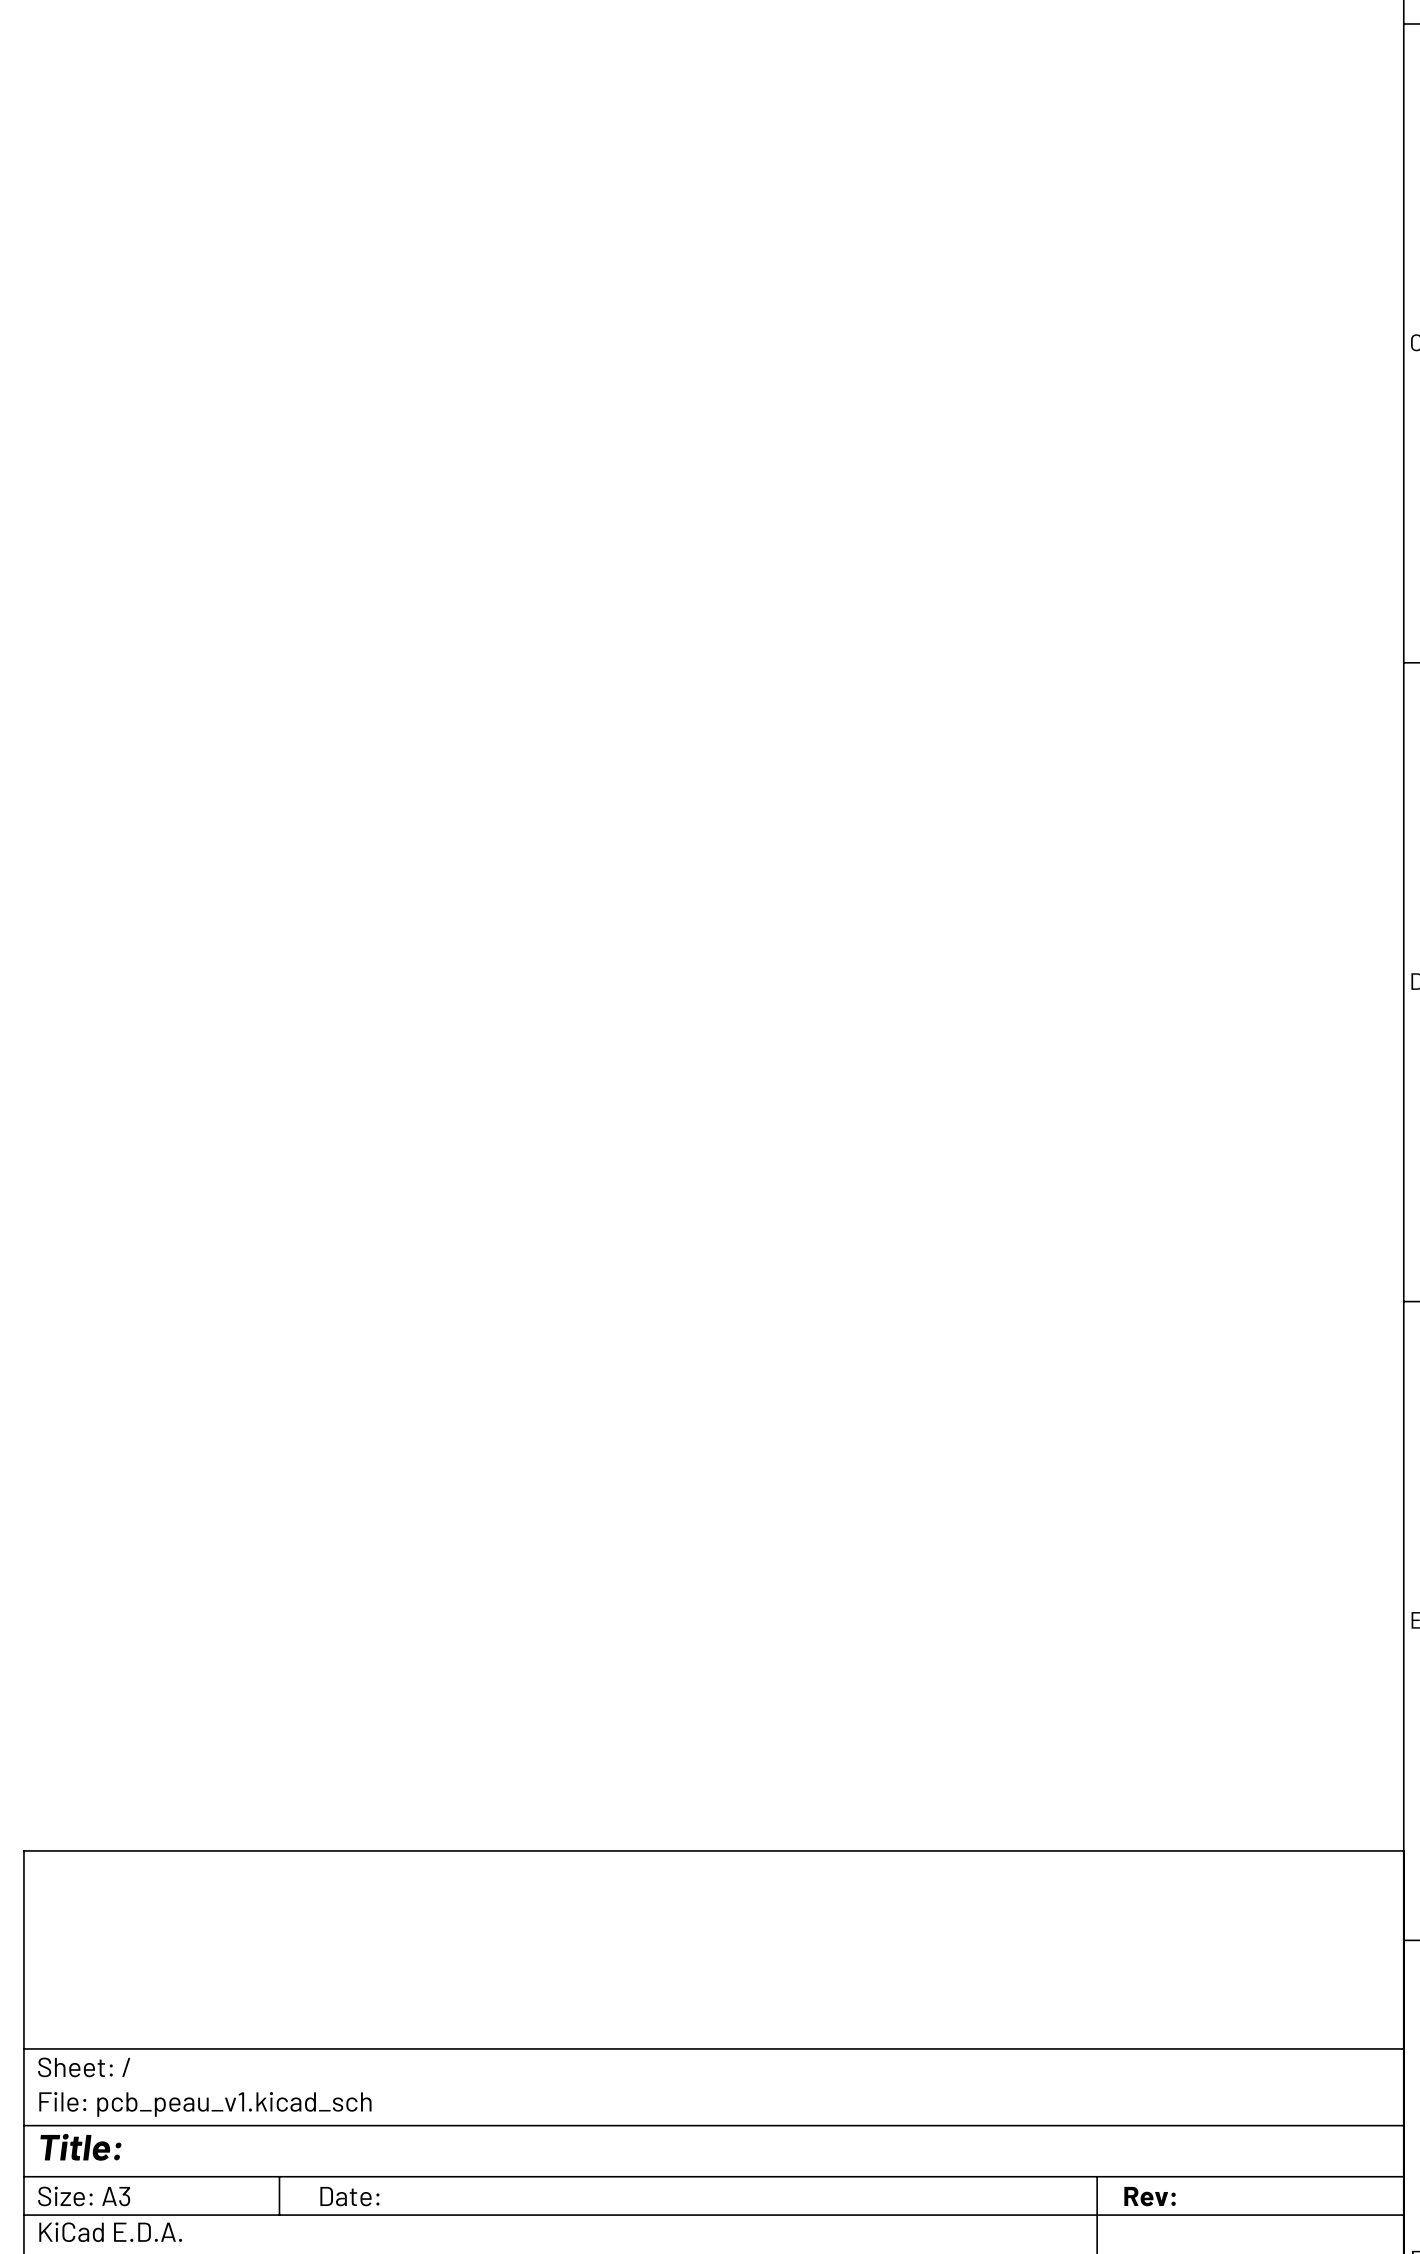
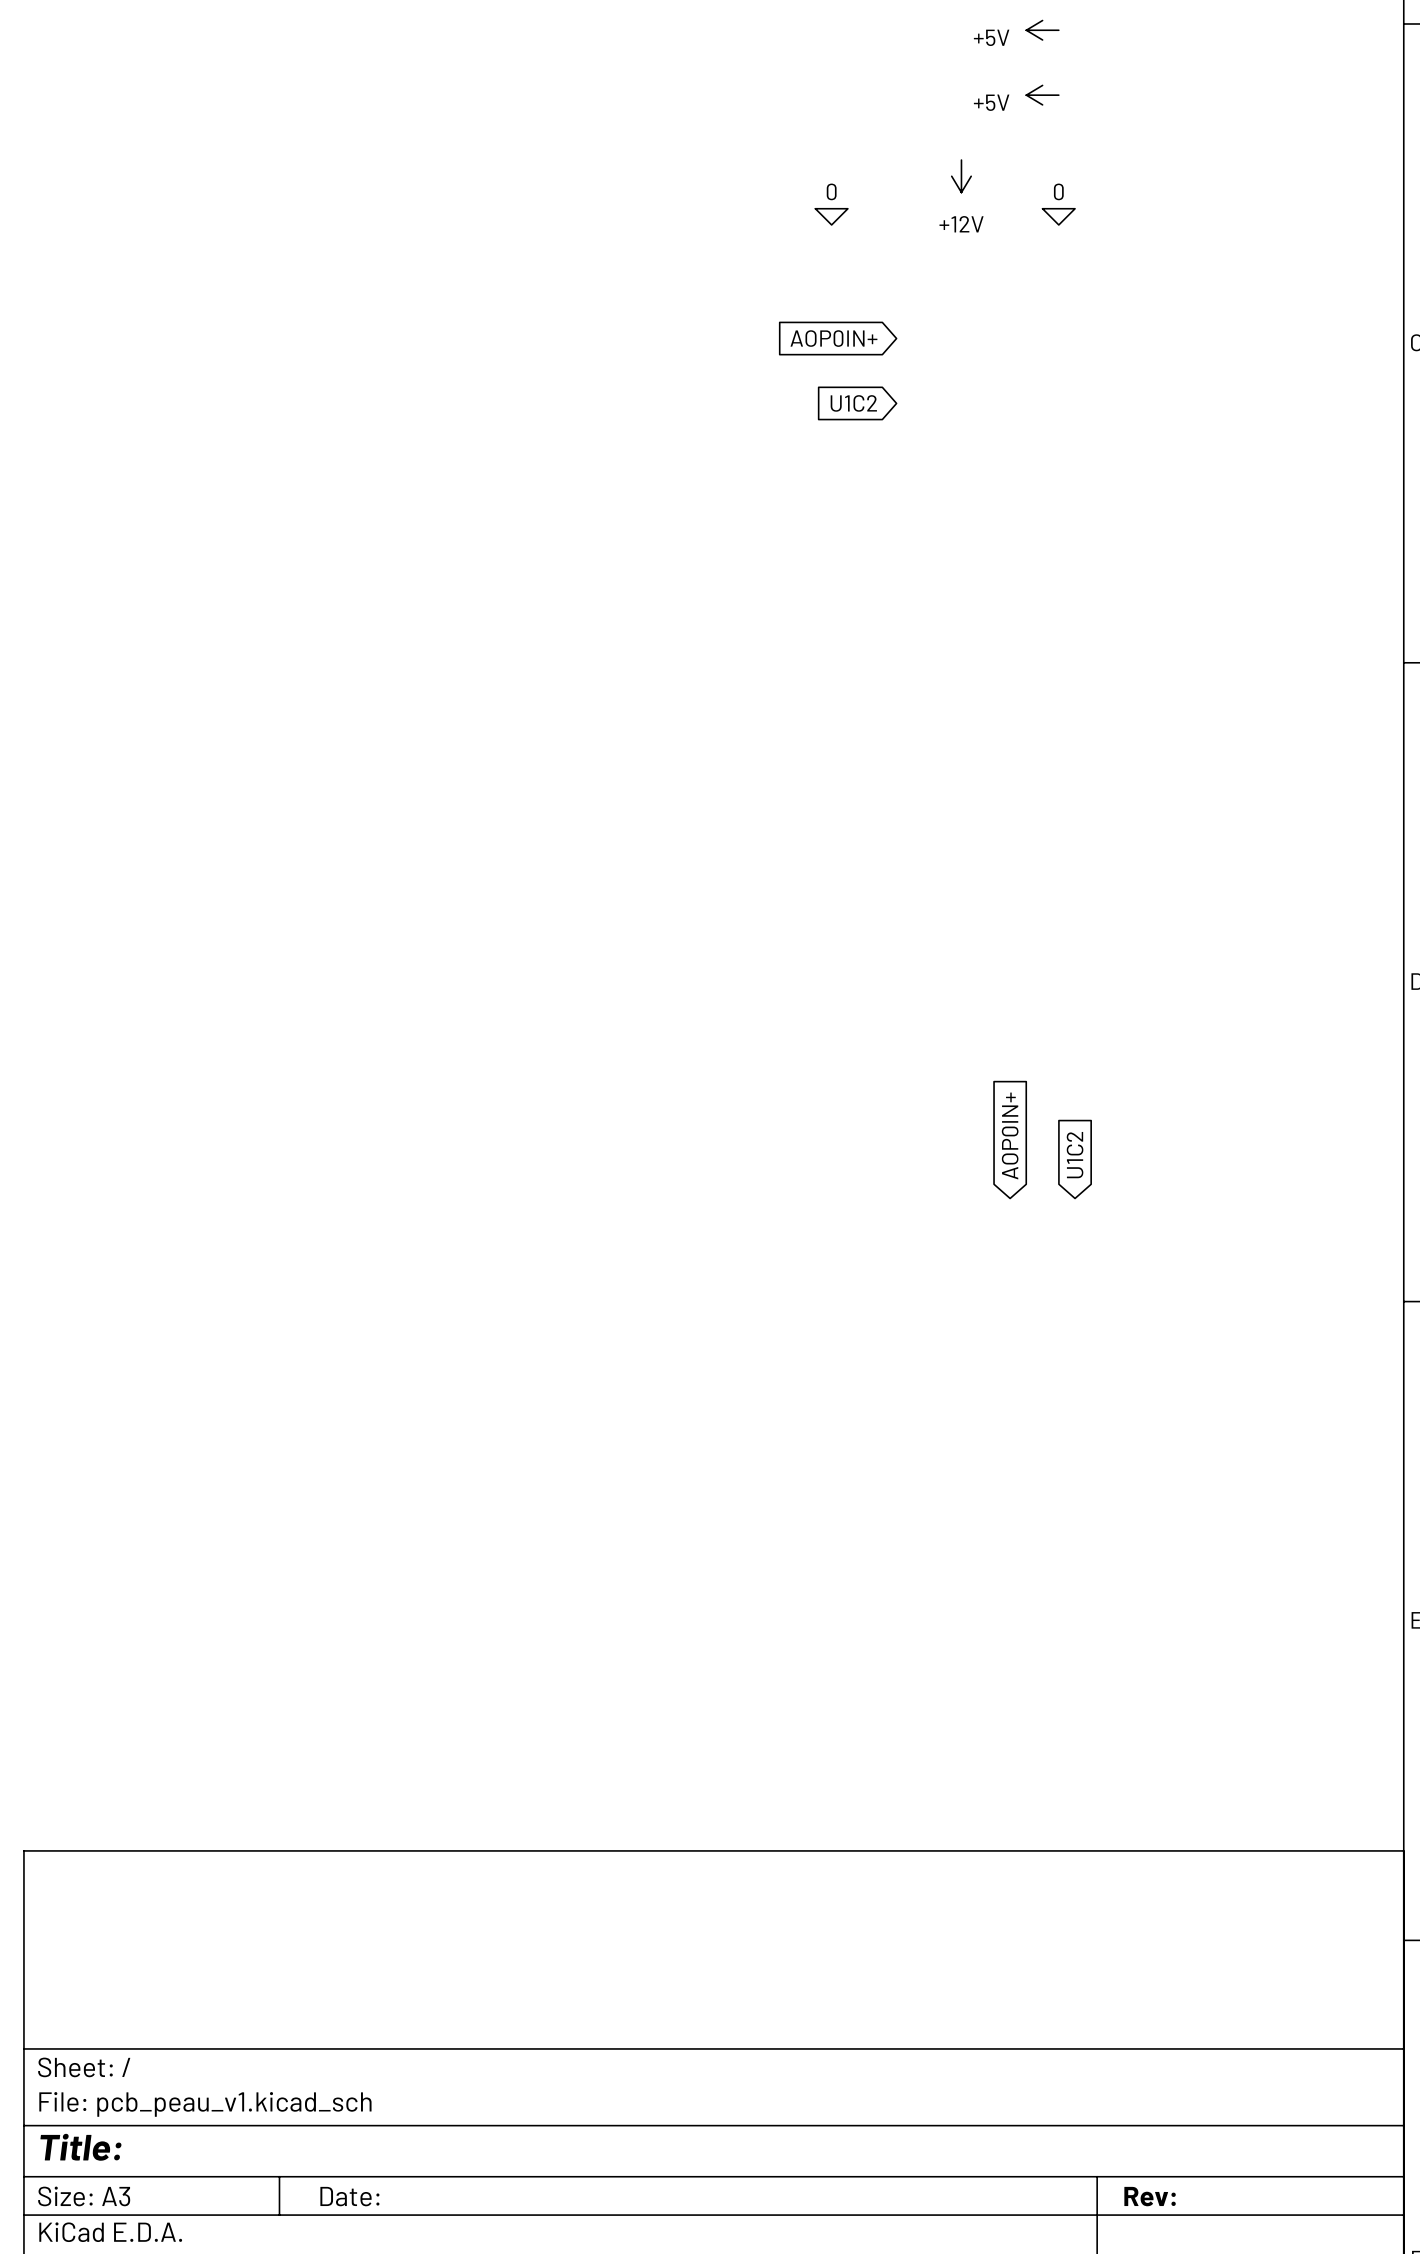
power symbol: none -> +5V (1042, 30)
power symbol: none -> +5V (1042, 95)
power symbol: none -> +12V (961, 176)
power symbol: none -> 0 (831, 216)
power symbol: none -> 0 (1058, 216)
global label: none -> AOP0IN+ (833, 338)
global label: none -> U1C2 (853, 403)
global label: none -> AOP0IN+ (1010, 1136)
global label: none -> U1C2 (1075, 1155)

